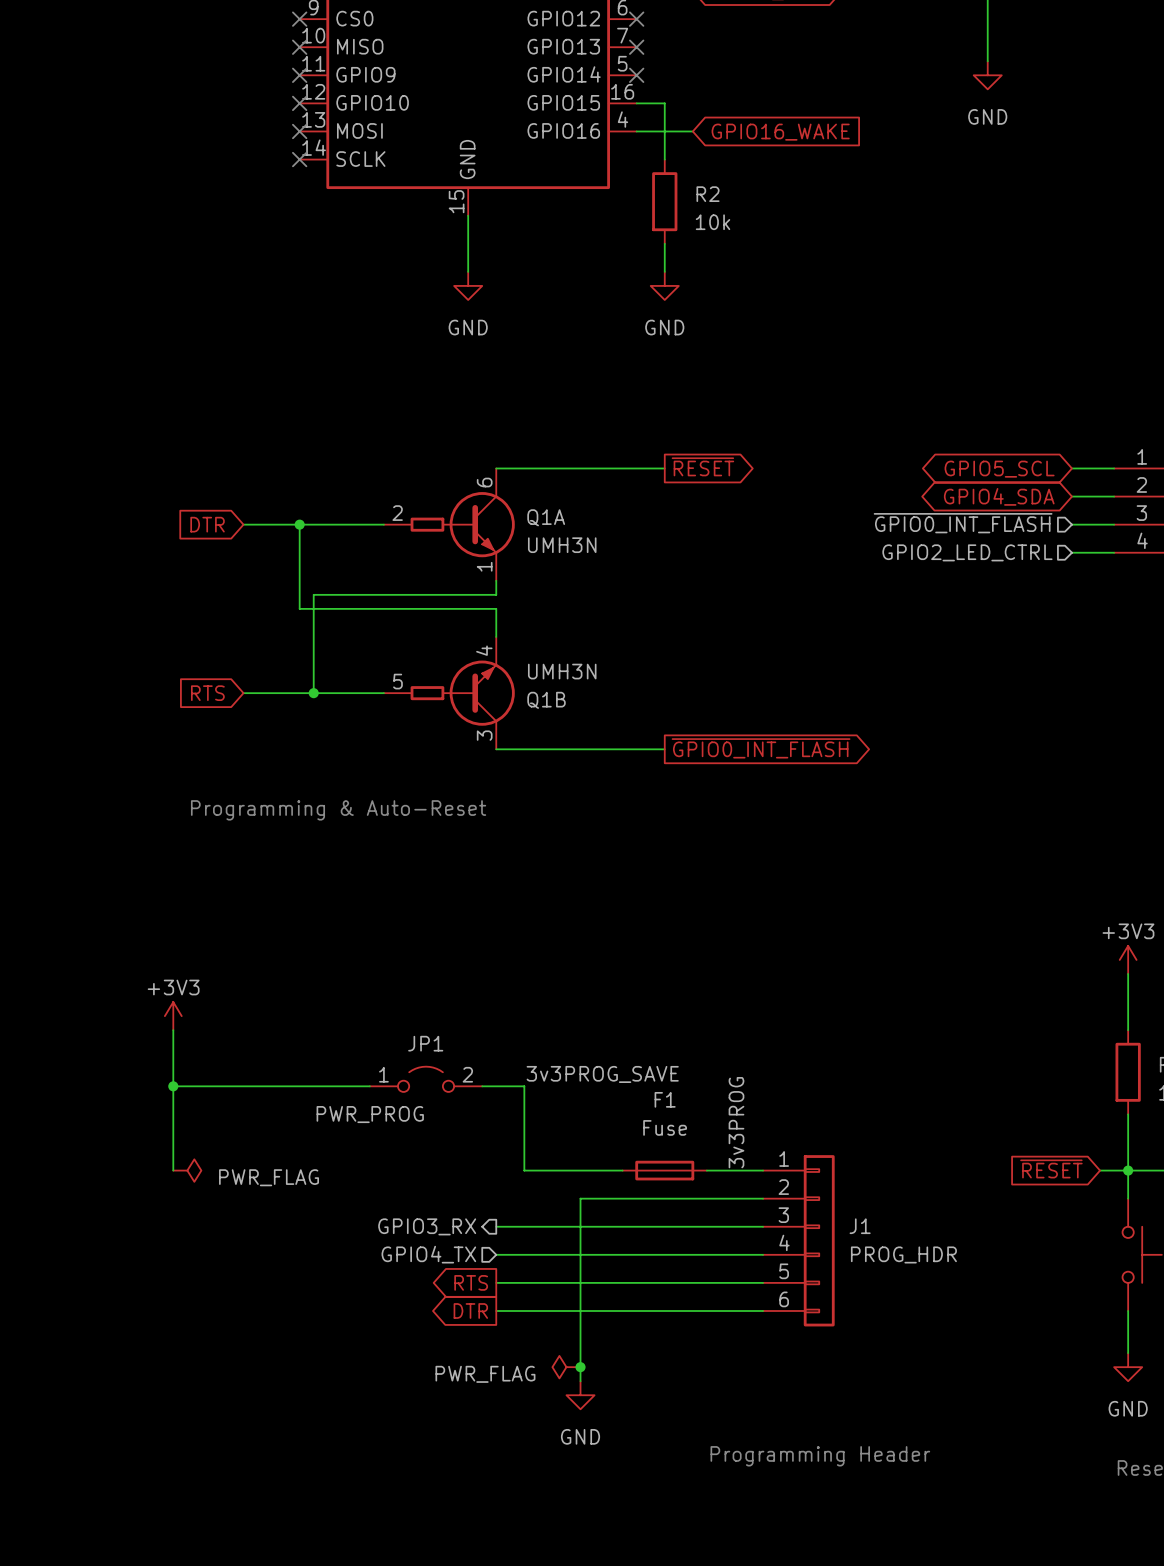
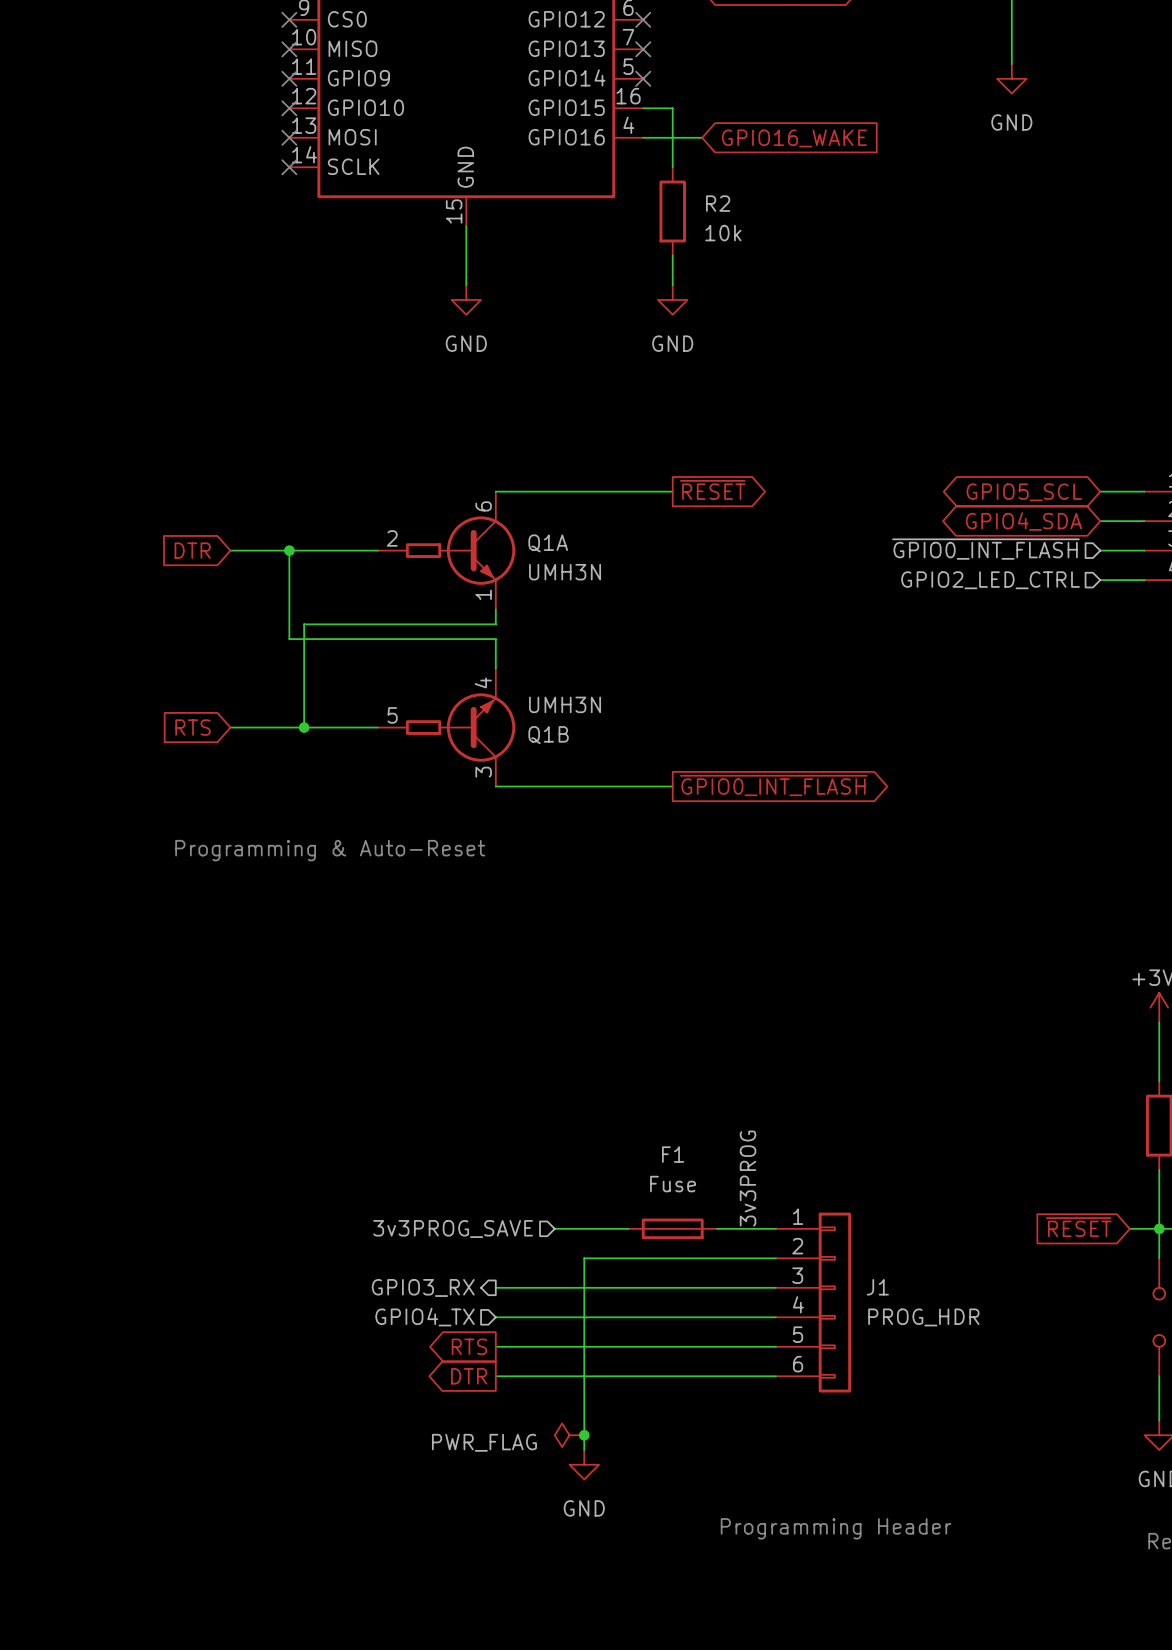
power symbol: +3V3 (173, 1016) -> none
wire: (173, 1030) (173, 1170) -> none
label: 3v3PROG_SAVE (602, 1074) -> none
JP1: PWR_PROG (426, 1079) -> none
wire: (173, 1086) (369, 1086) -> none
junction: (173, 1086) -> none
wire: (482, 1086) (524, 1086) (524, 1170) (552, 1170) -> none
power symbol: PWR_FLAG (187, 1170) -> none
hierarchical label: none -> 3v3PROG_SAVE (453, 1228)

